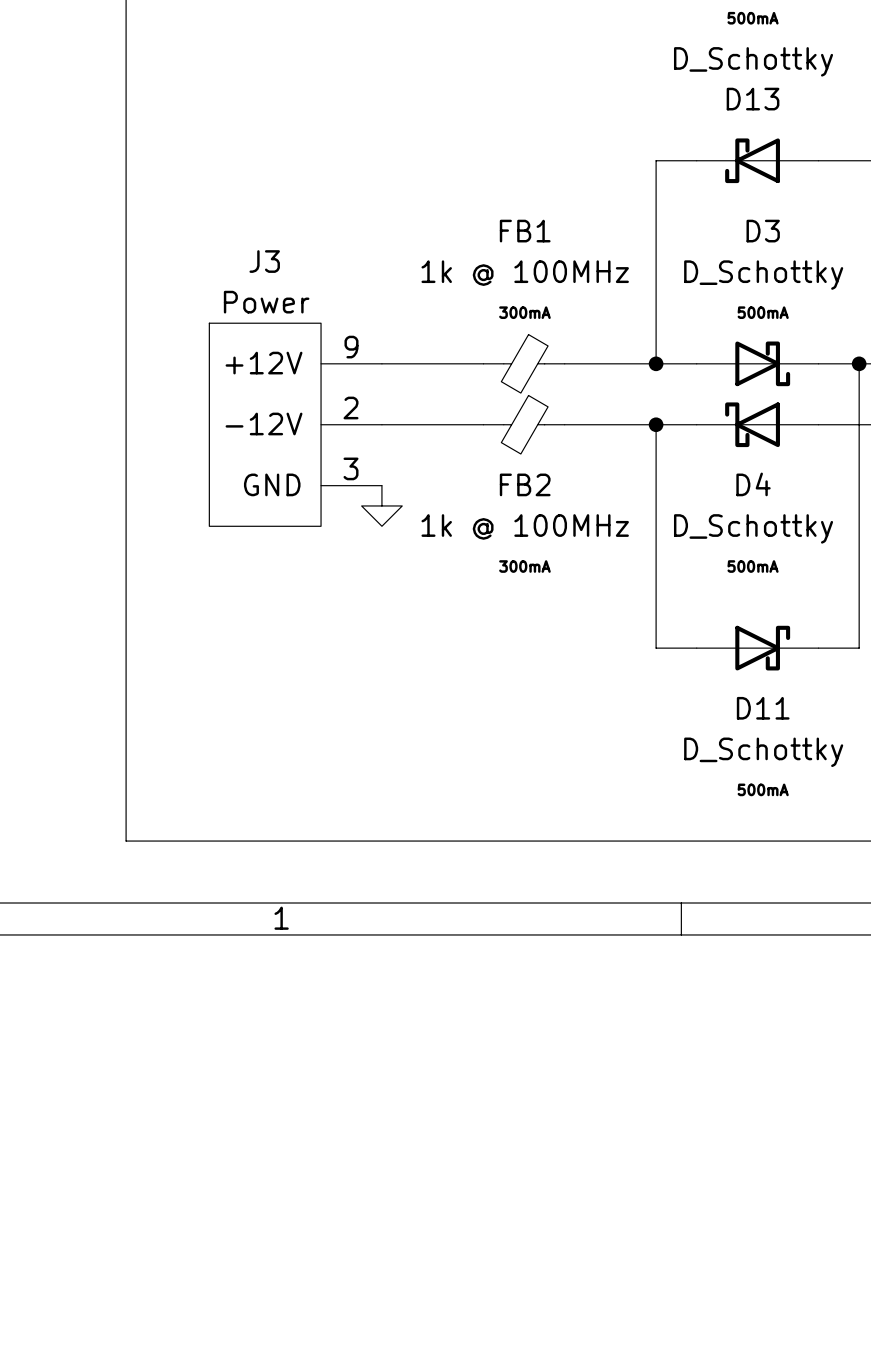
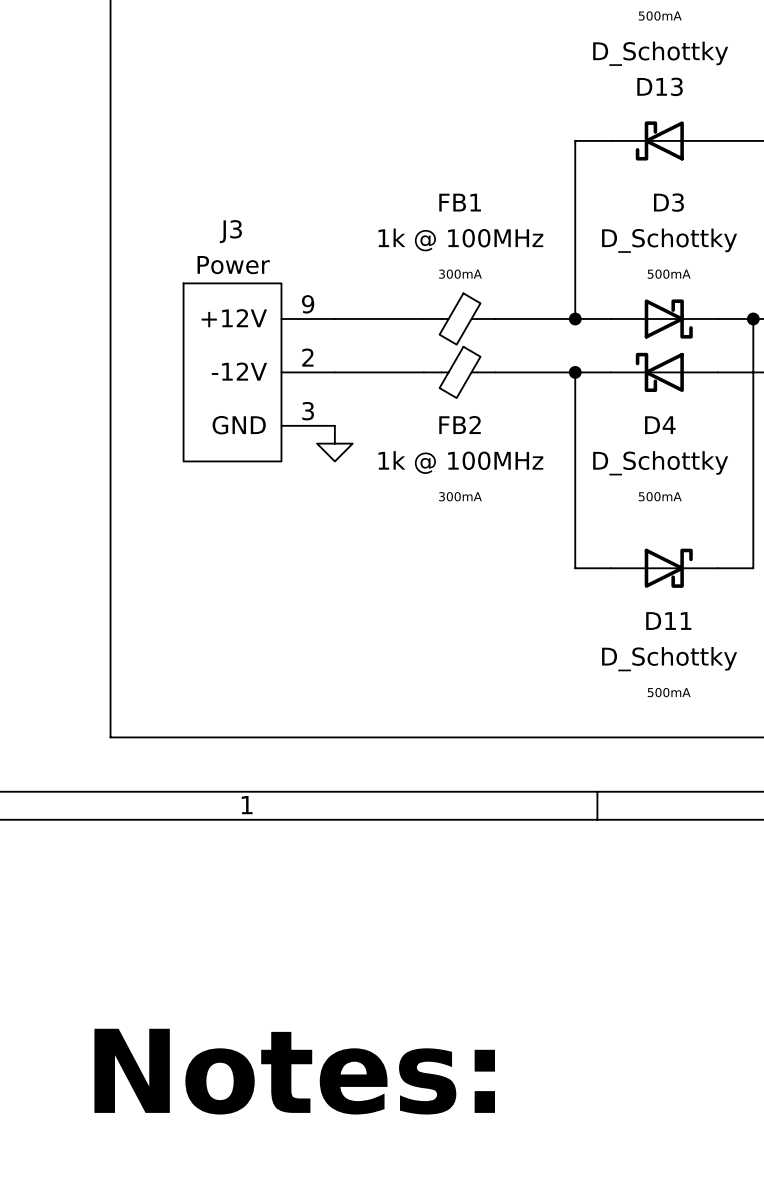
text: none -> Notes: (294, 1071)

